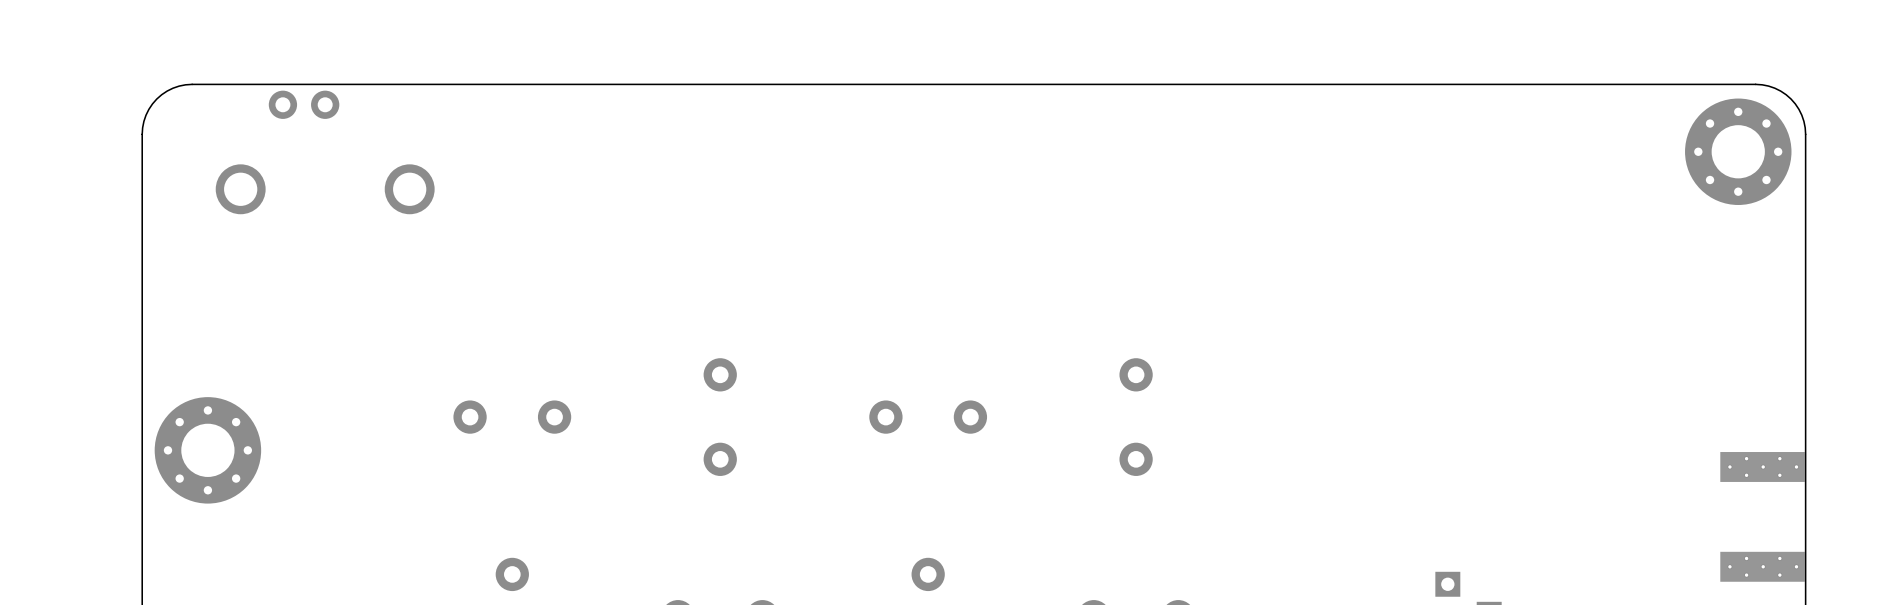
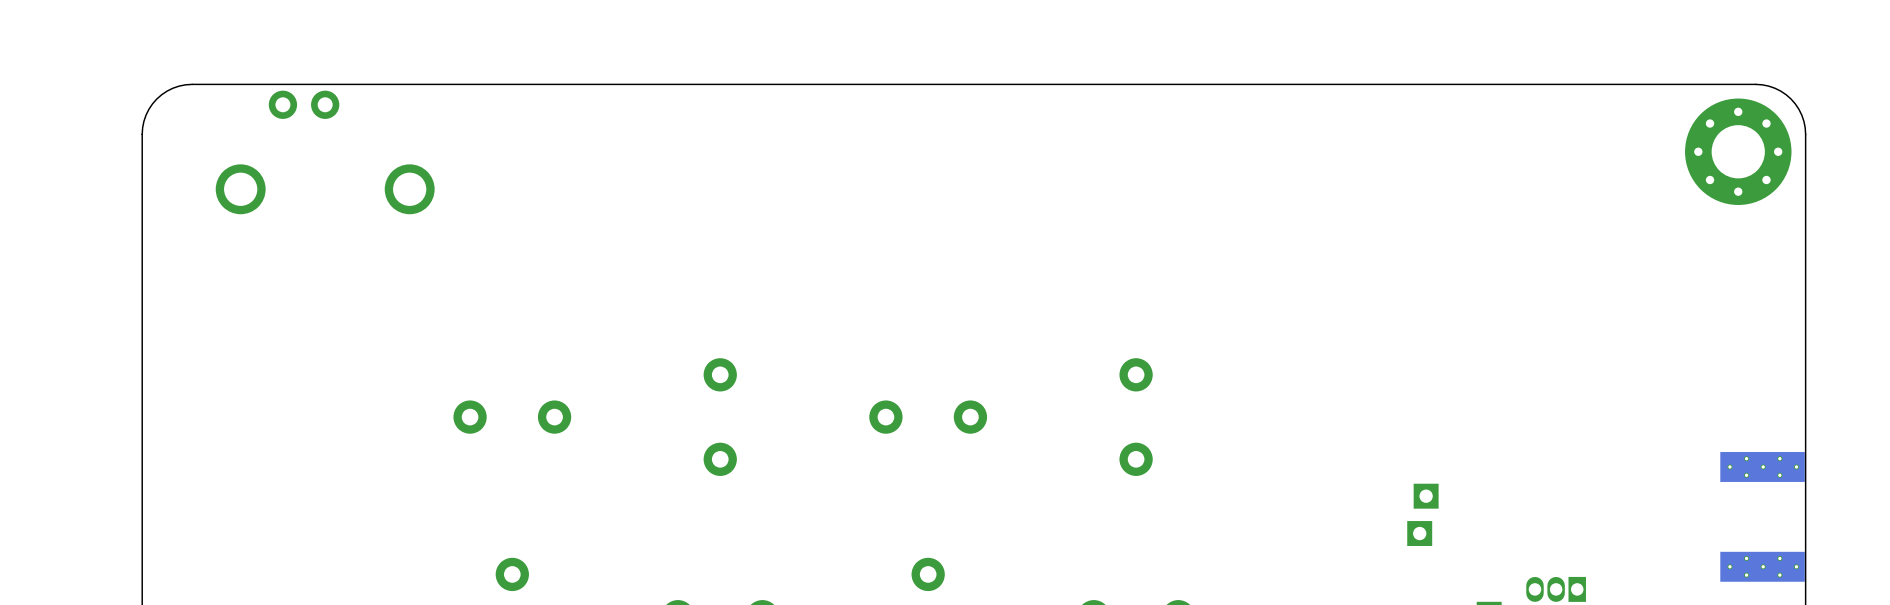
part: (207, 450) -> none
part: none -> (1426, 496)
part: none -> (1419, 533)
part: (1447, 584) -> none
part: none -> (1556, 589)

